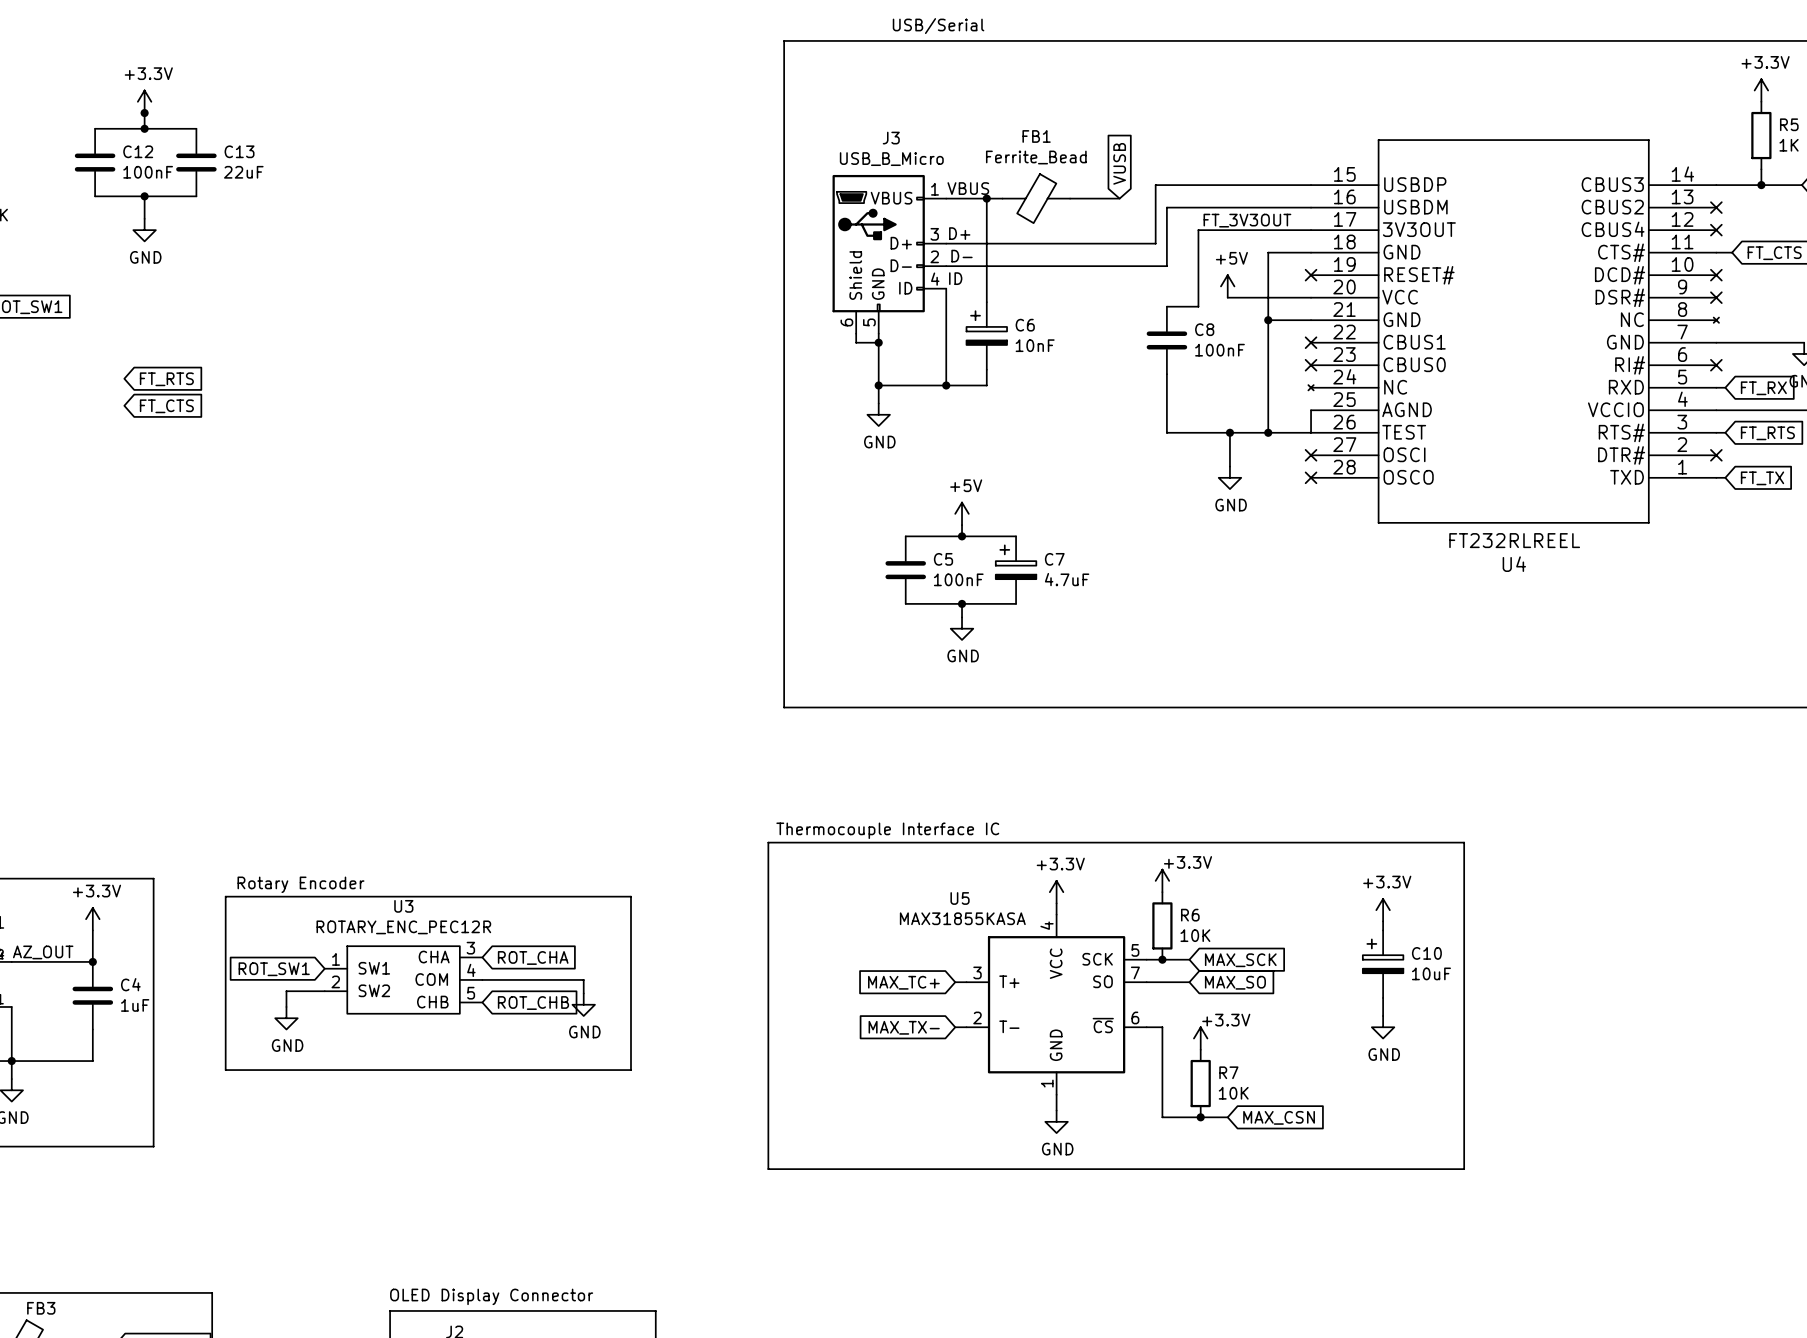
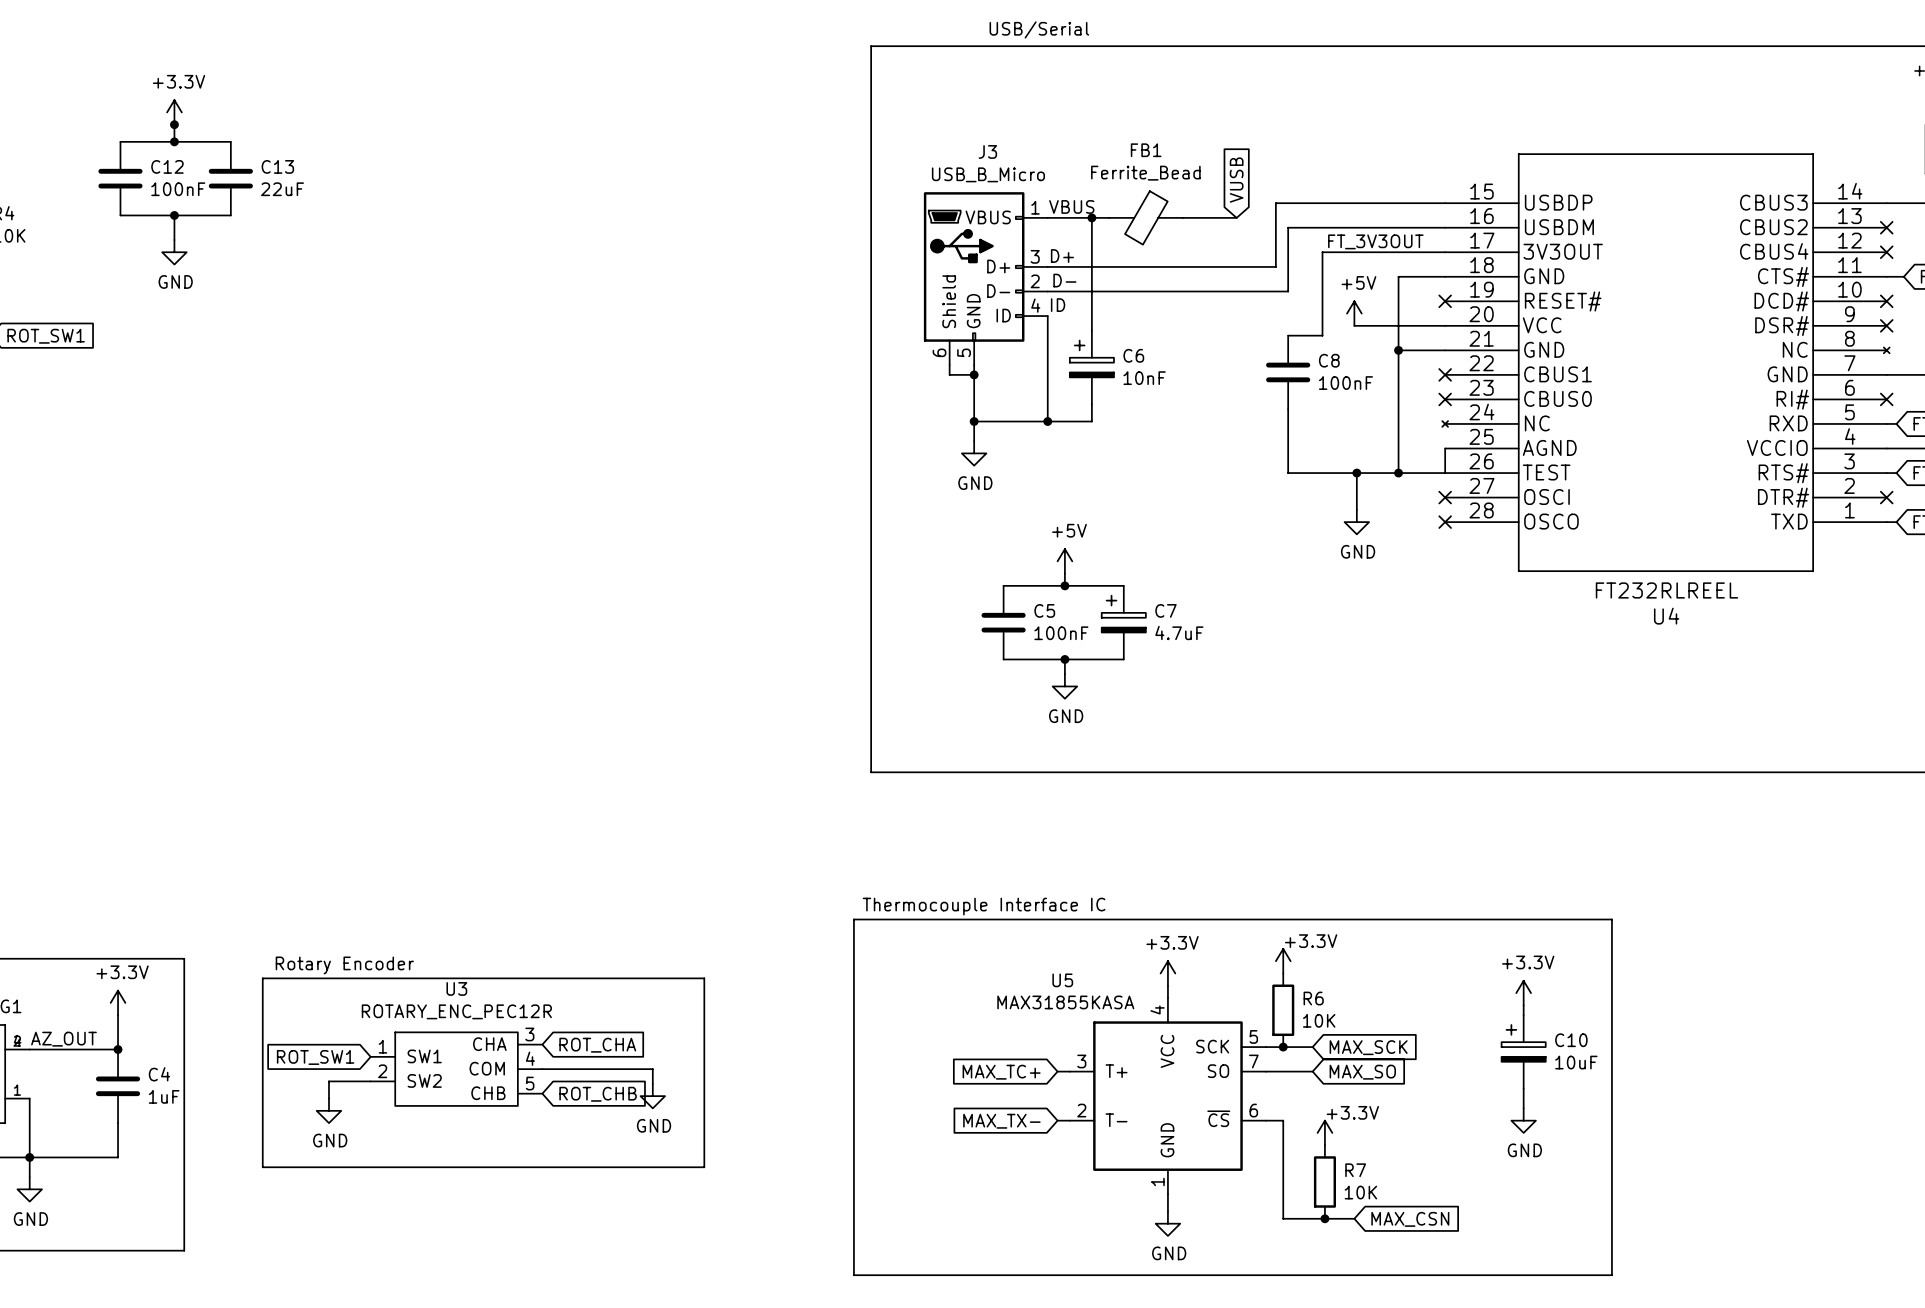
global label: FT_RTS (166, 379) -> none
global label: FT_CTS (166, 406) -> none

